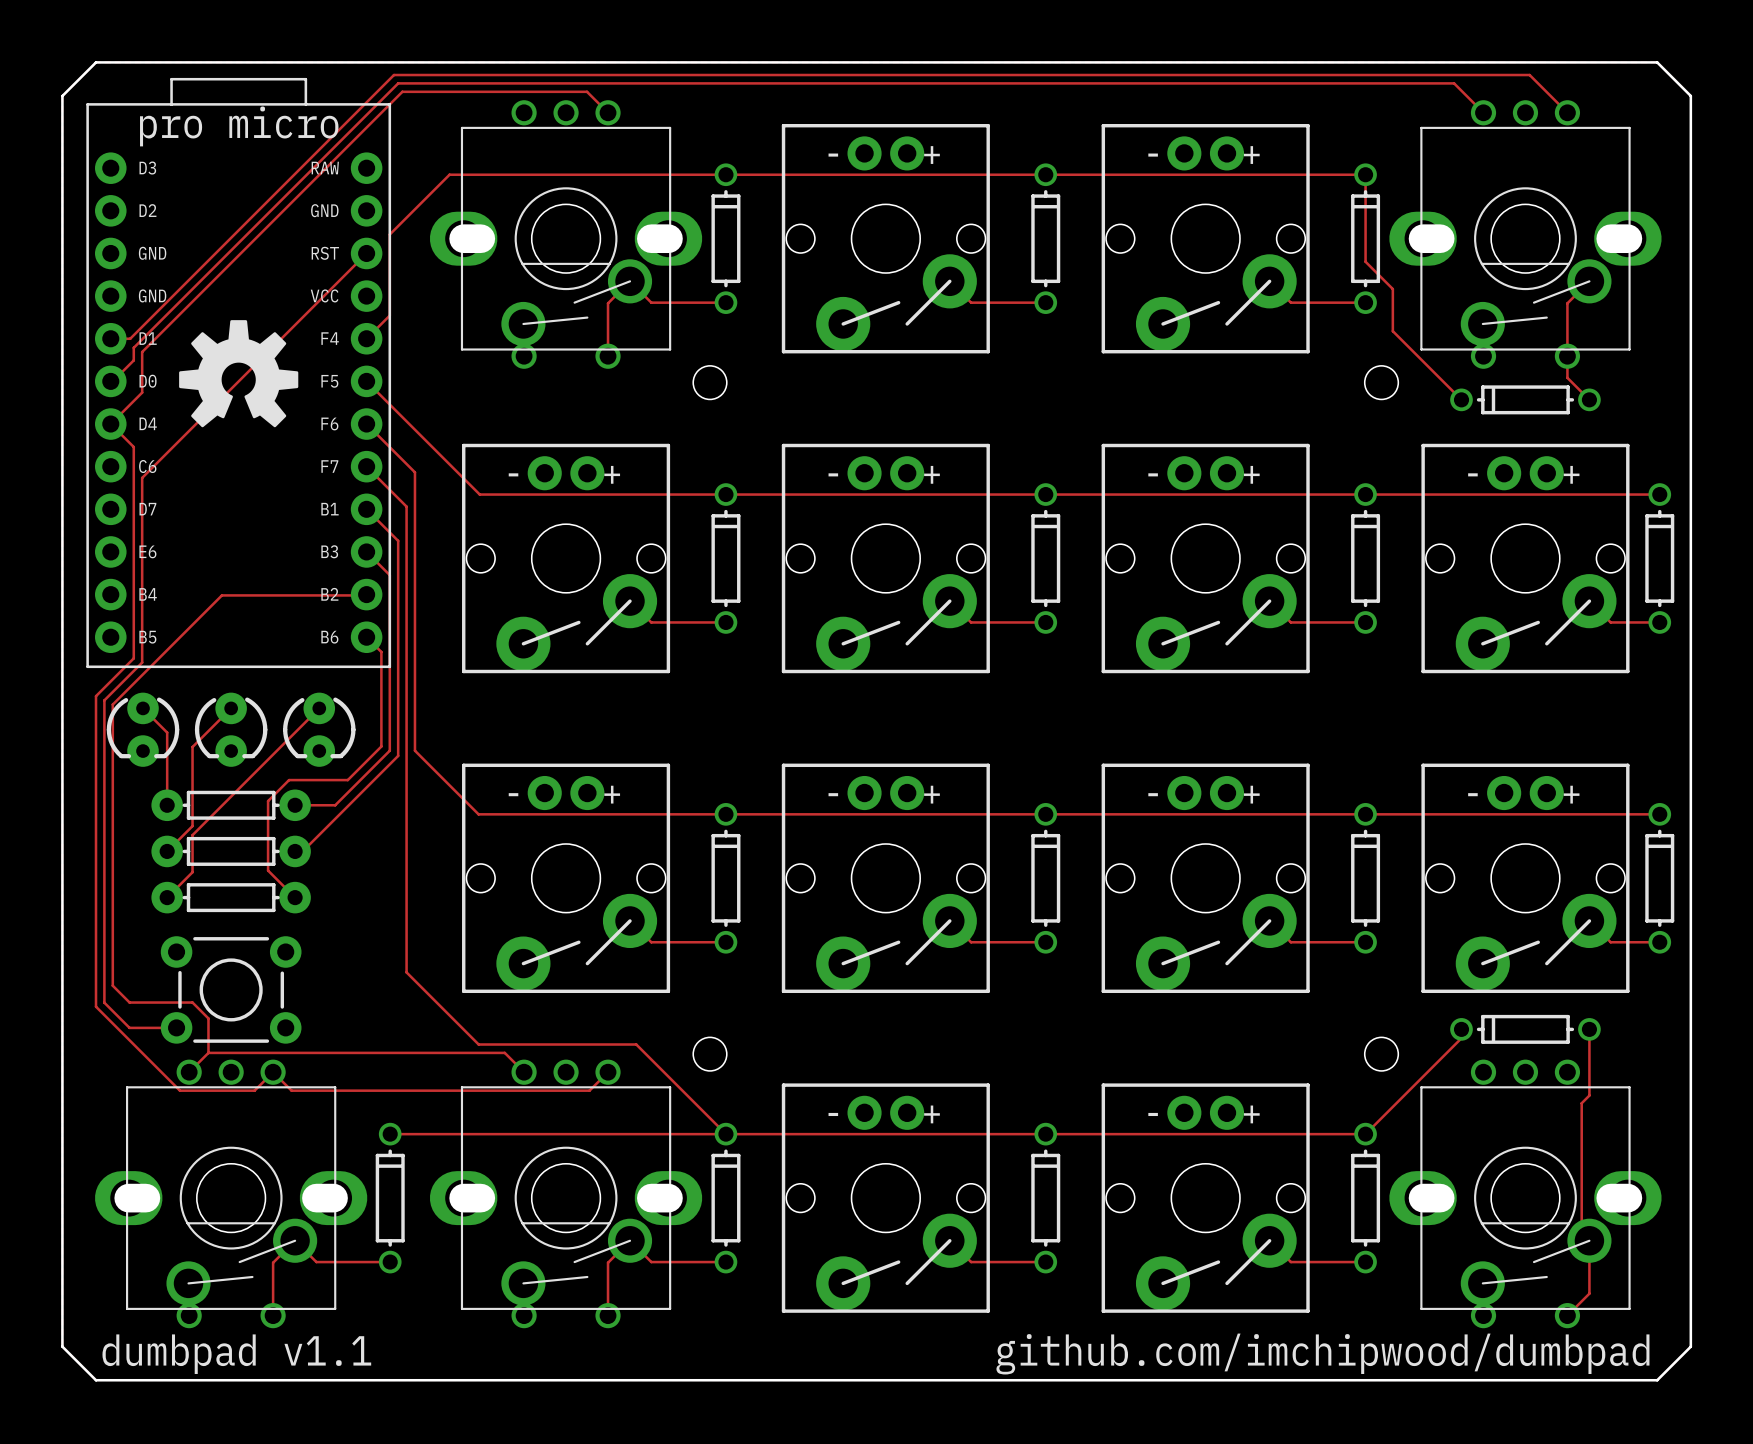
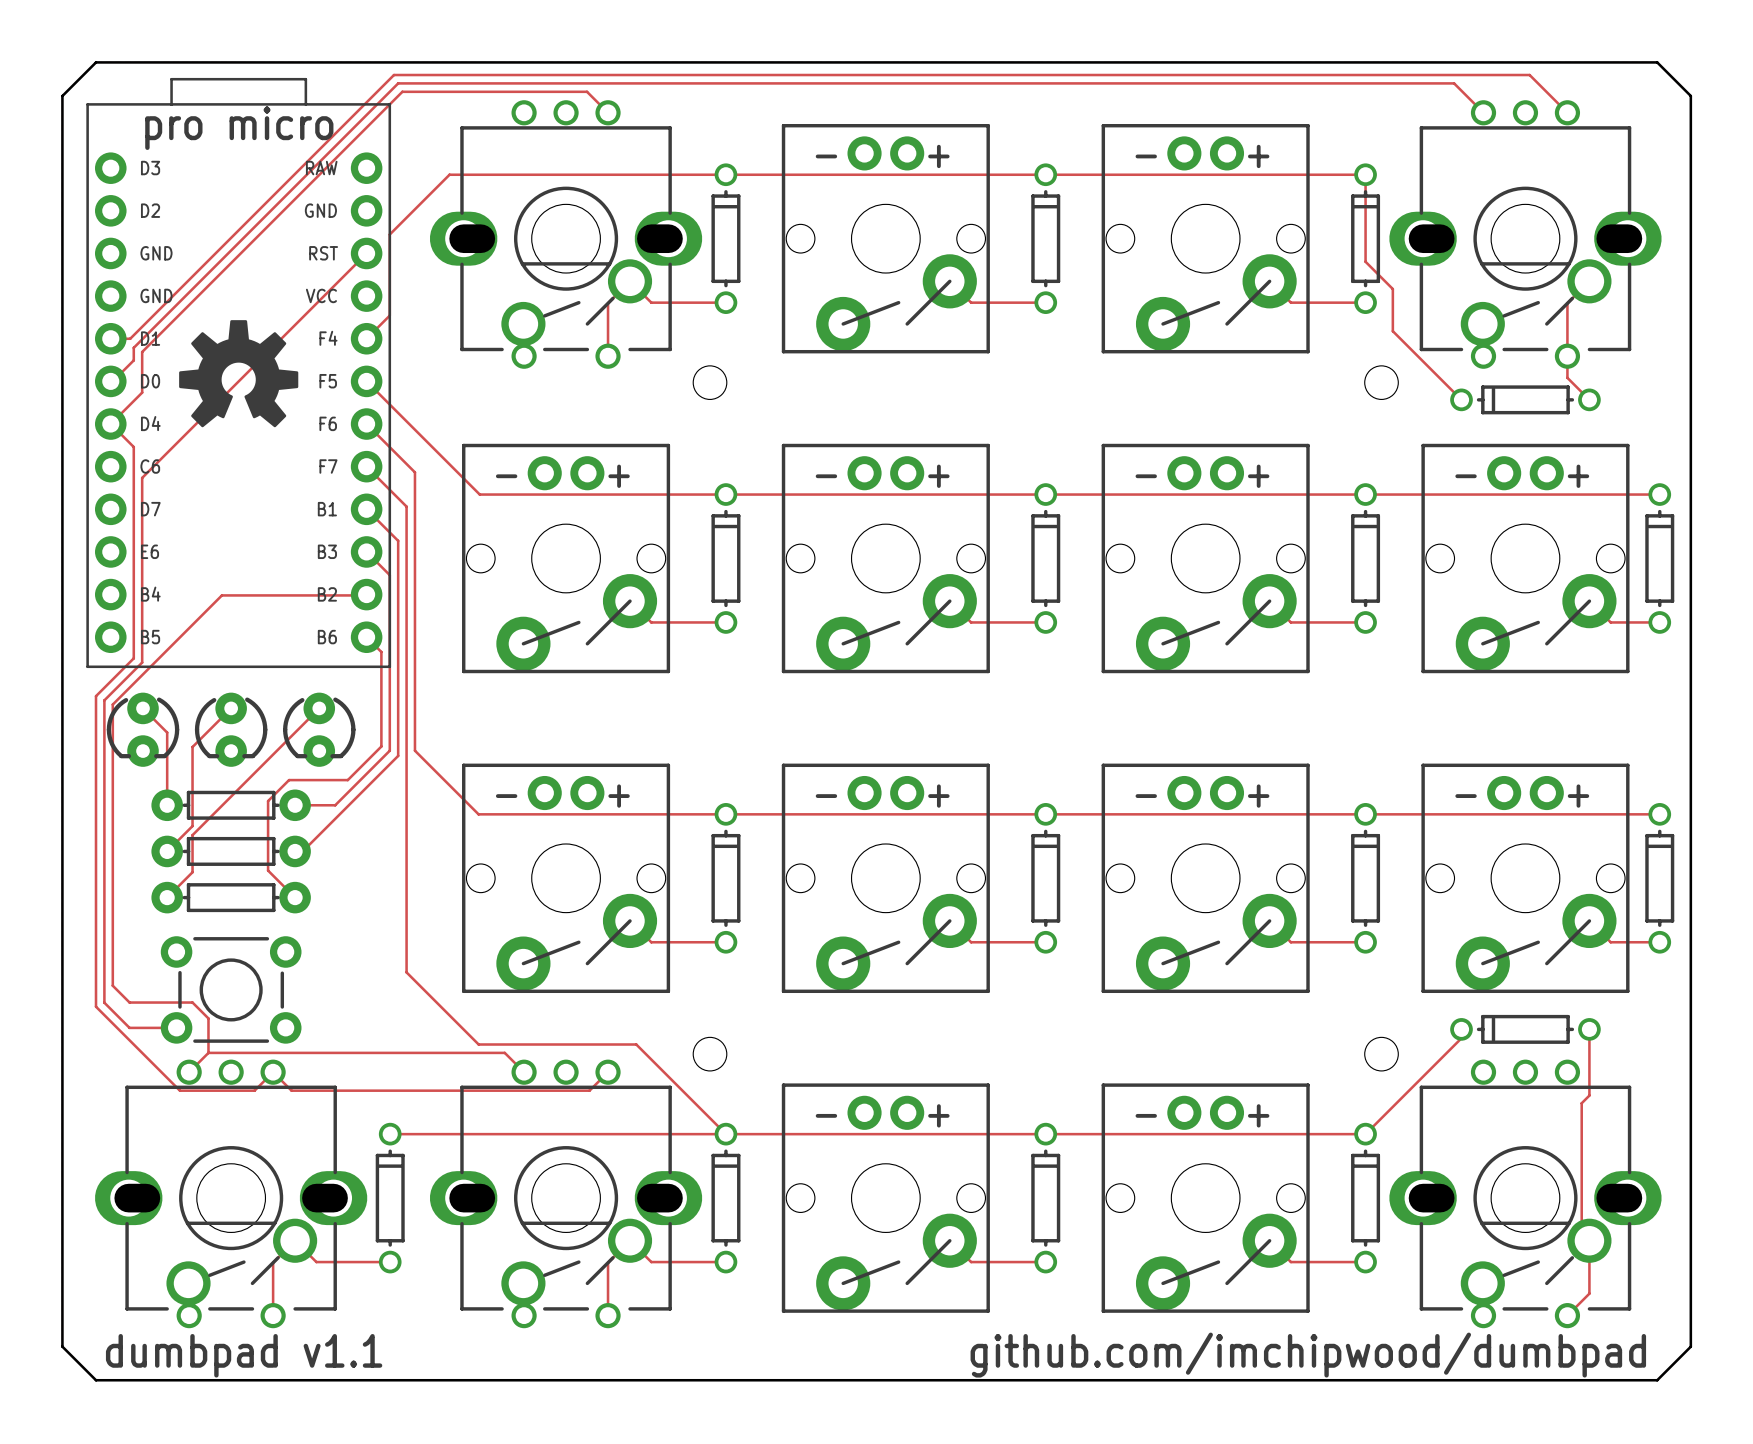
part footprint: [429, 100, 703, 369] -> [429, 100, 703, 369]
part footprint: [1389, 100, 1662, 369] -> [1389, 100, 1662, 369]
part footprint: [94, 1059, 368, 1329] -> [94, 1059, 368, 1329]
part footprint: [429, 1059, 703, 1329] -> [429, 1059, 703, 1329]
part footprint: [1389, 1059, 1662, 1329] -> [1389, 1059, 1662, 1329]

